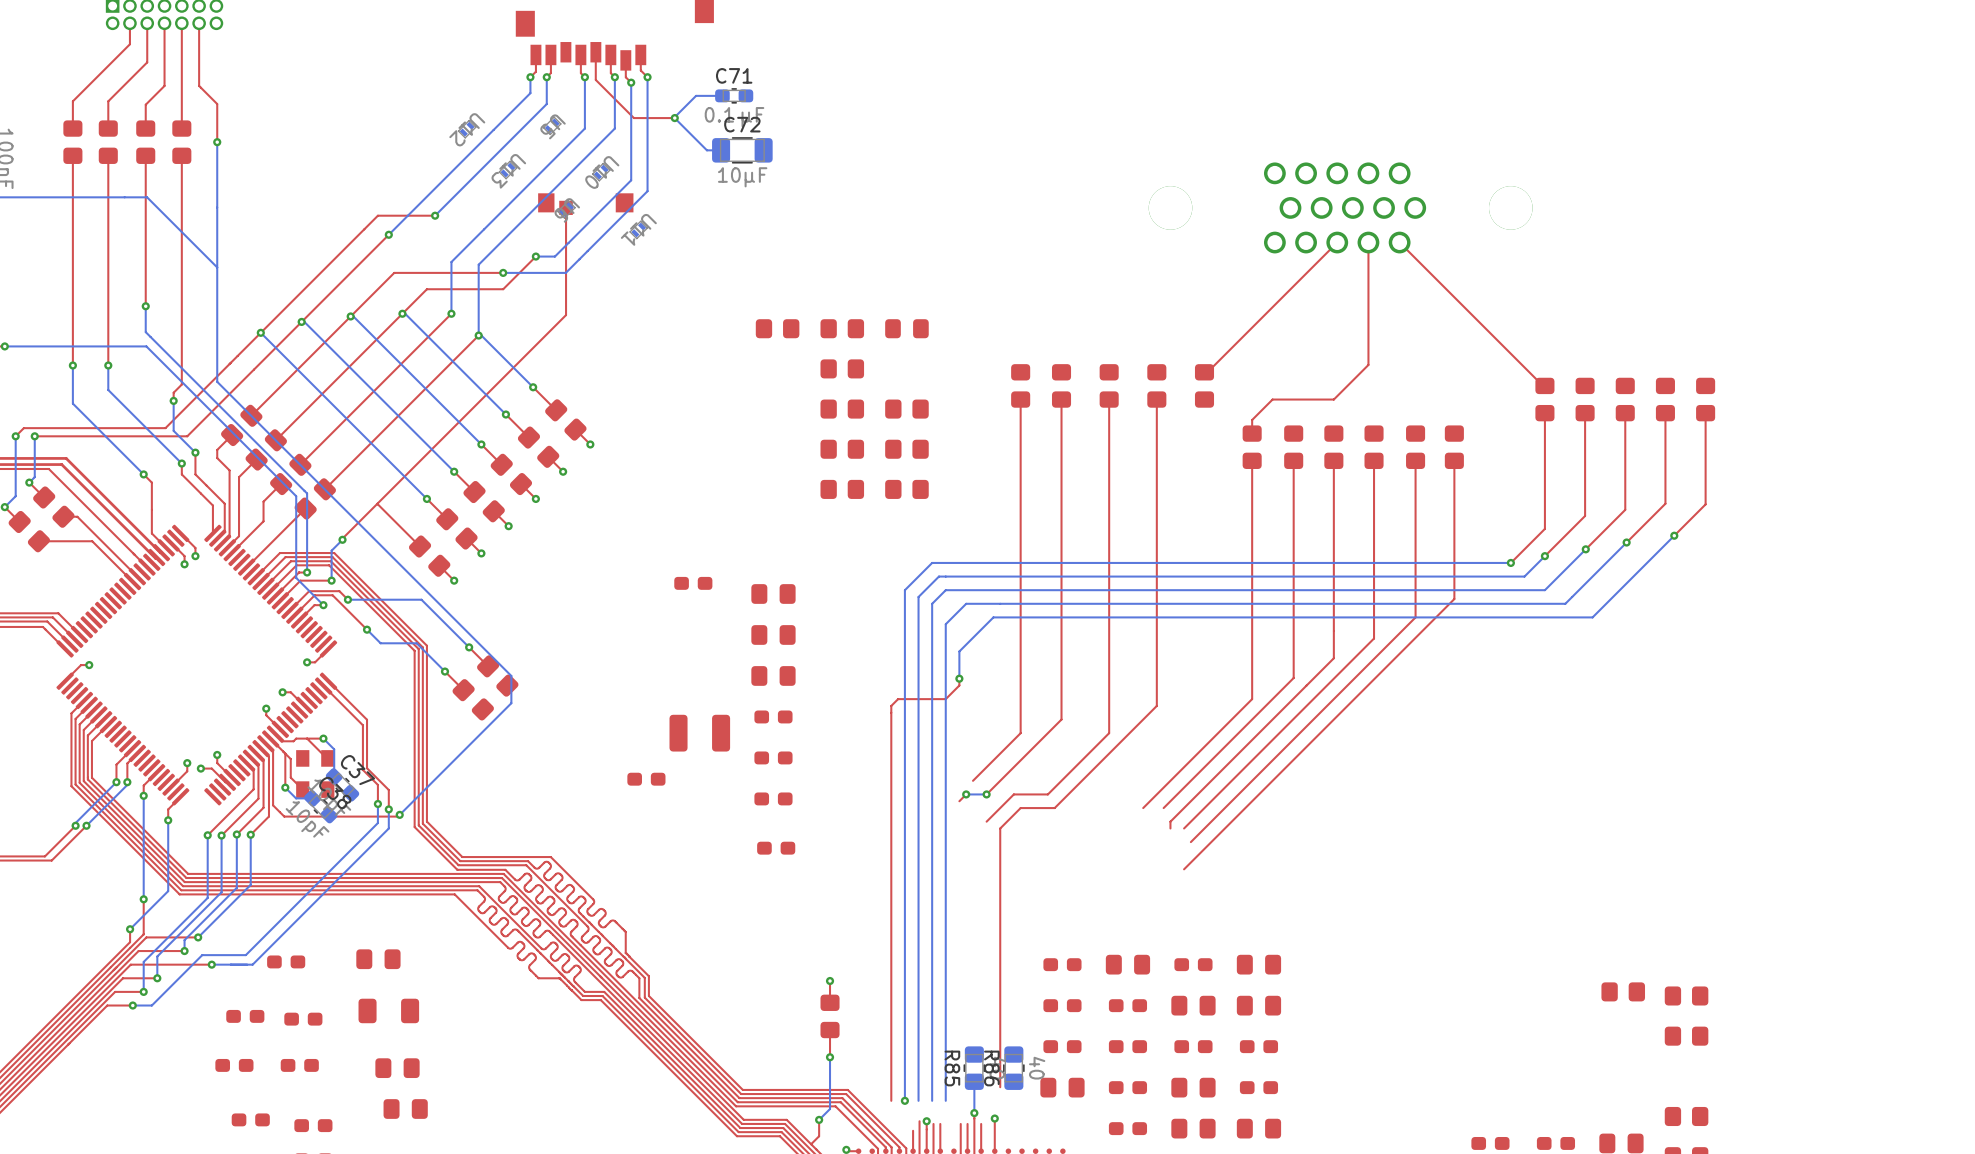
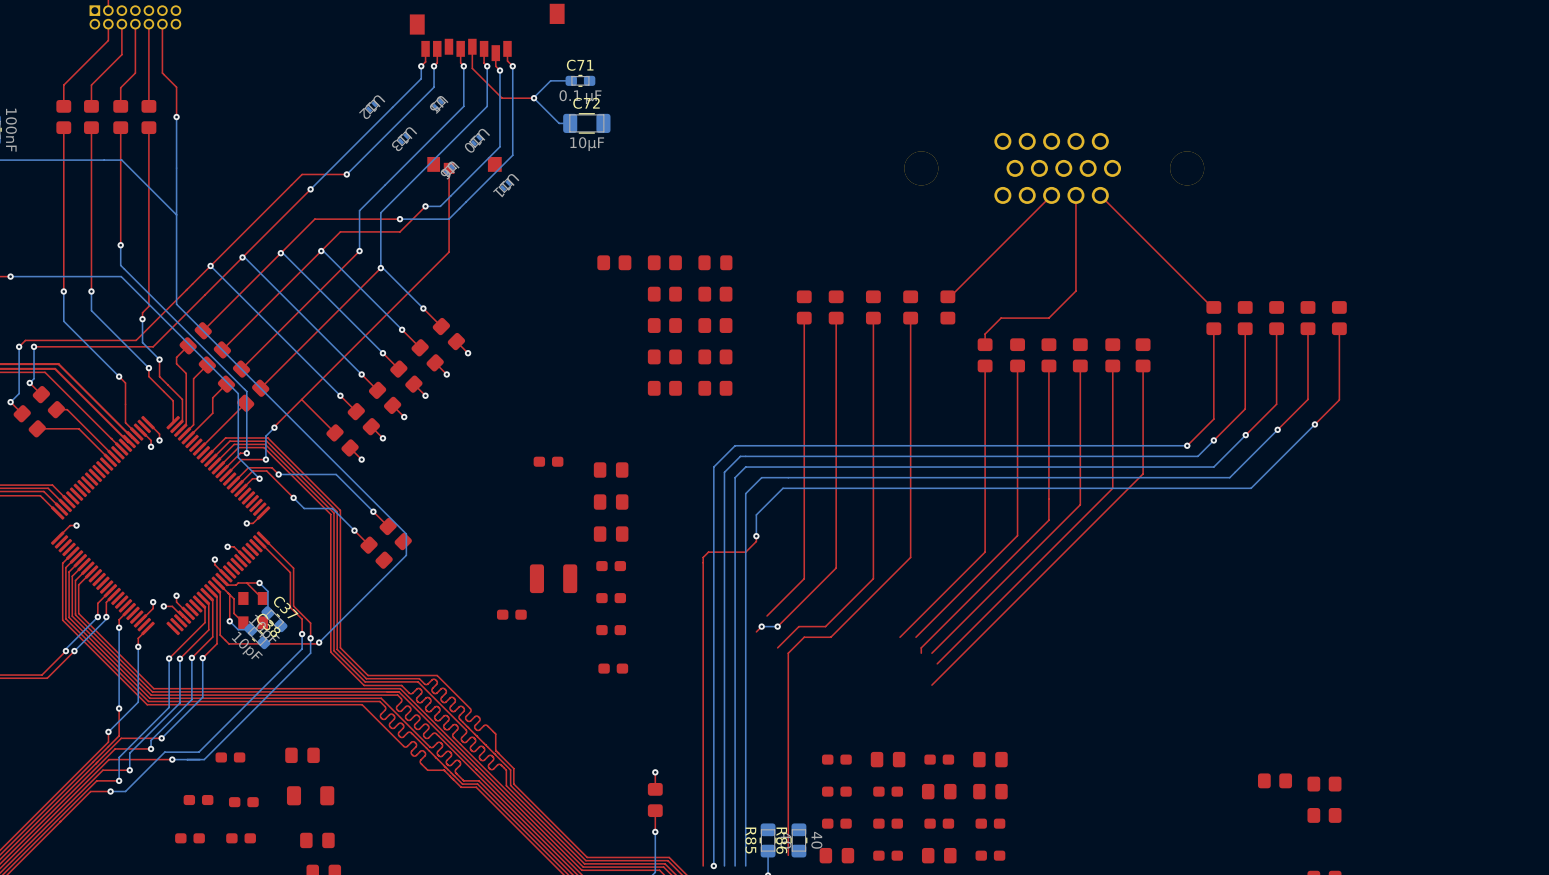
part: none -> (715, 294)

